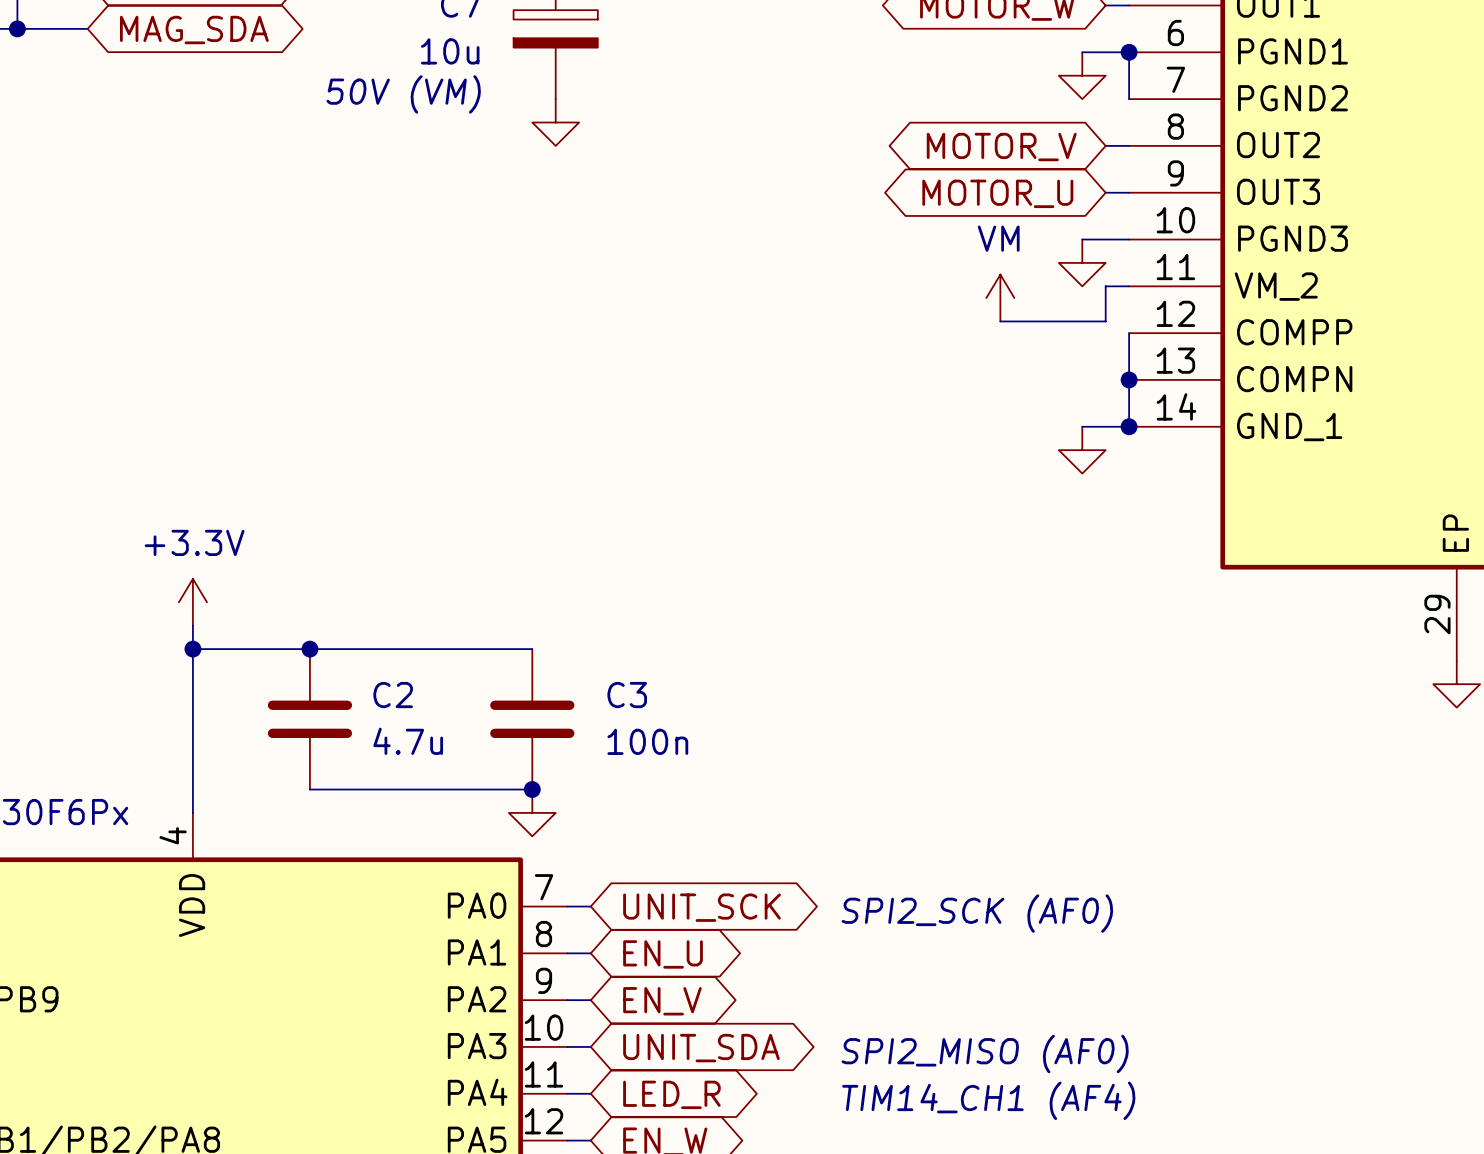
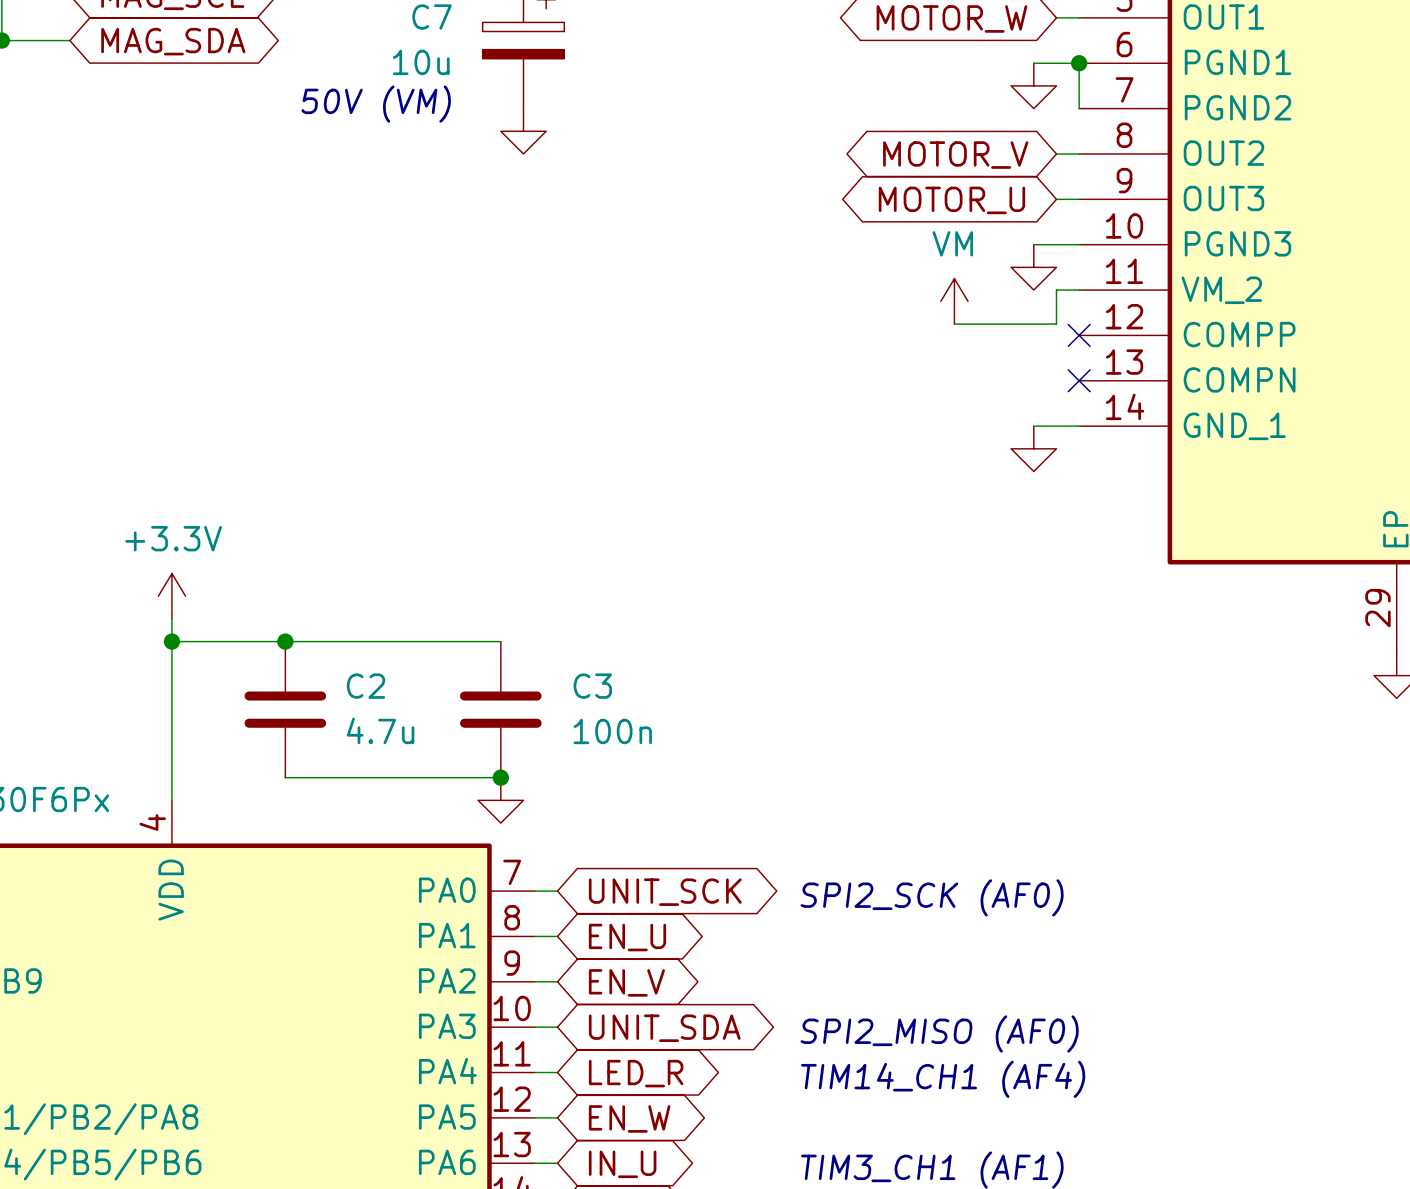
wire: (1129, 333) (1129, 426) -> none
no-connect mark: none -> (1079, 335)
junction: (1129, 379) -> none
no-connect mark: none -> (1079, 380)
junction: (1129, 426) -> none

